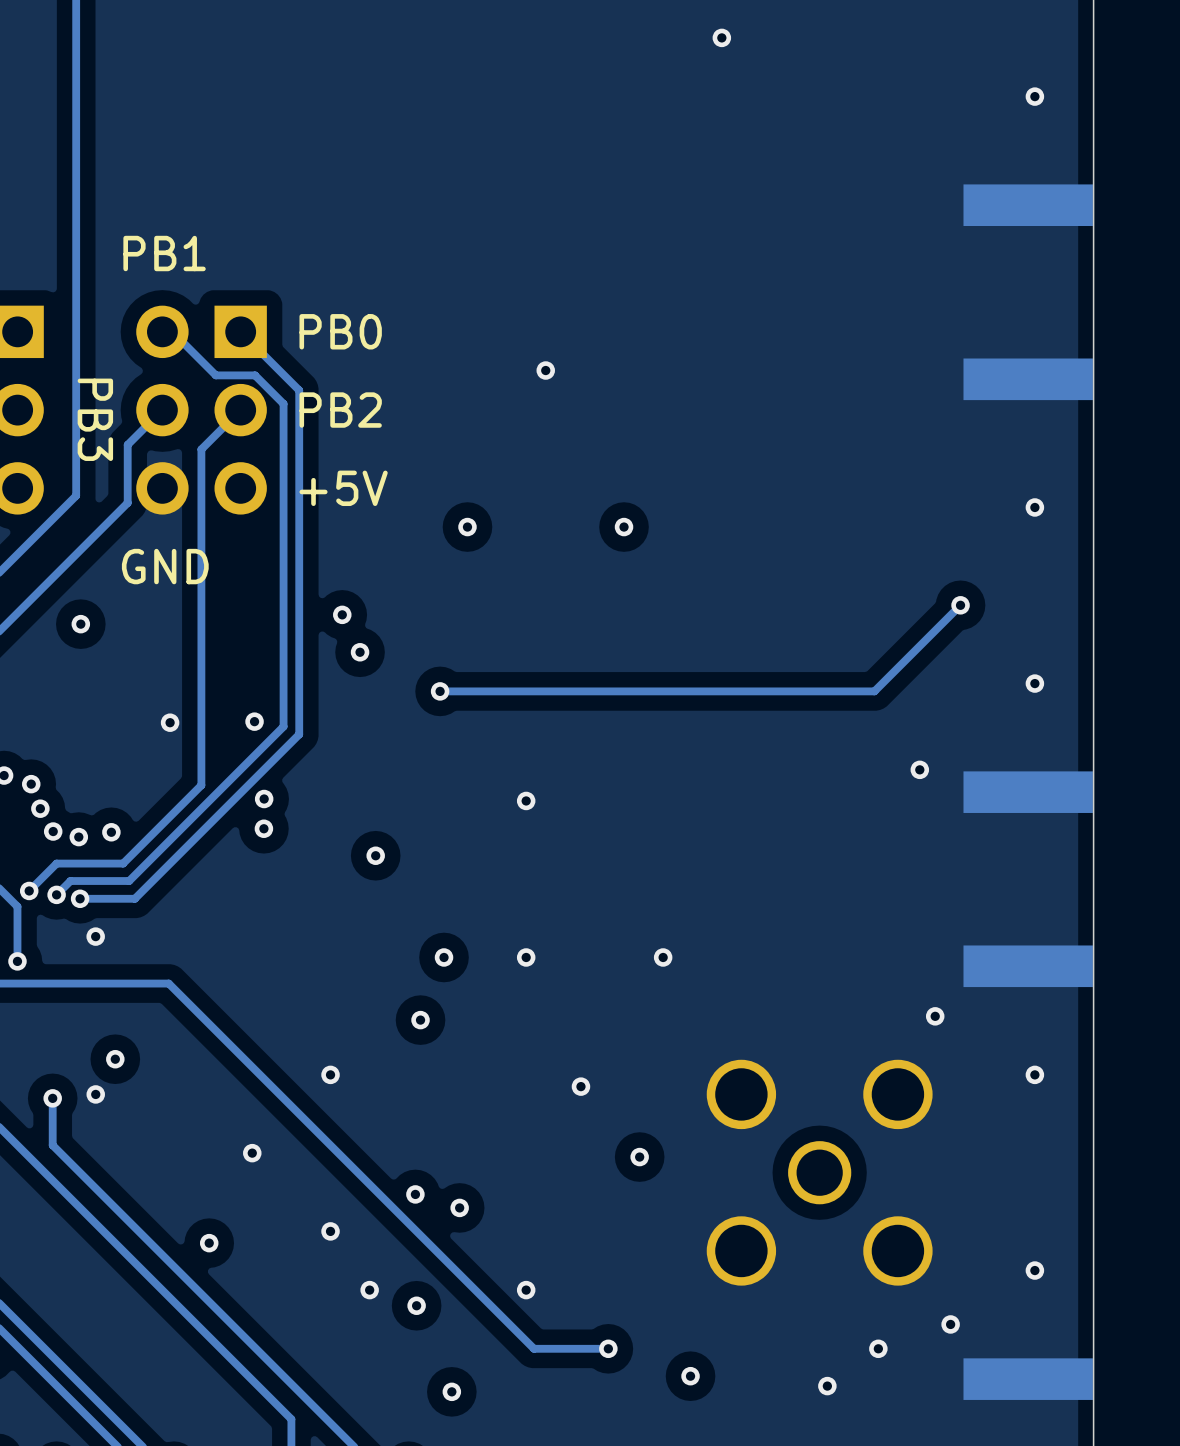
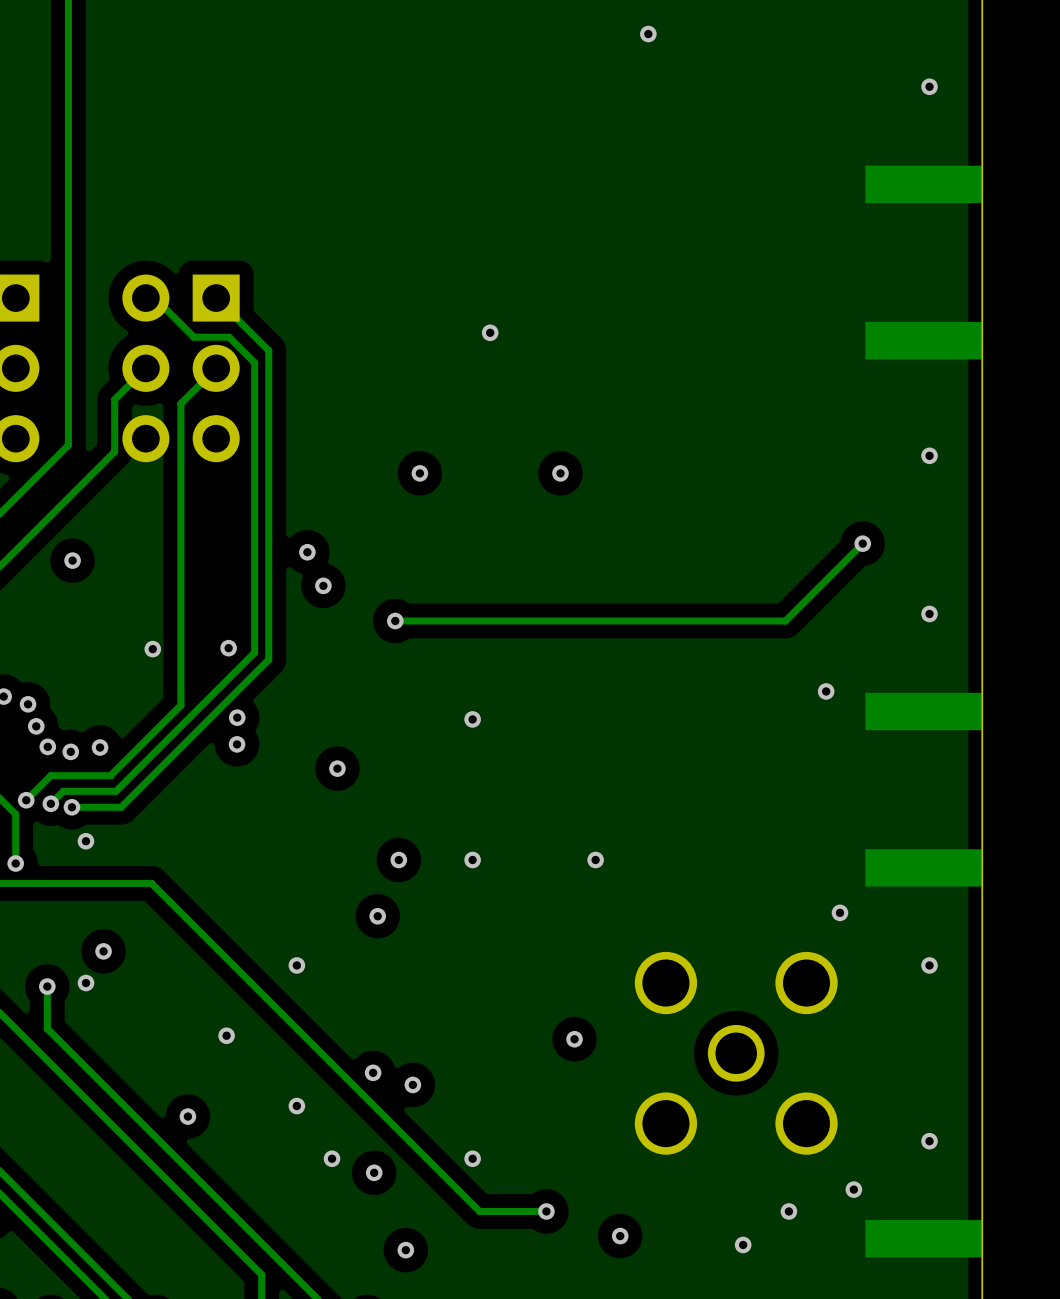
text: PB1 (164, 253) -> none
text: PB0 (340, 331) -> none
text: PB2 (340, 410) -> none
text: PB3 (95, 419) -> none
text: +5V (343, 488) -> none
text: GND (165, 566) -> none
via: (580, 1086) -> none

